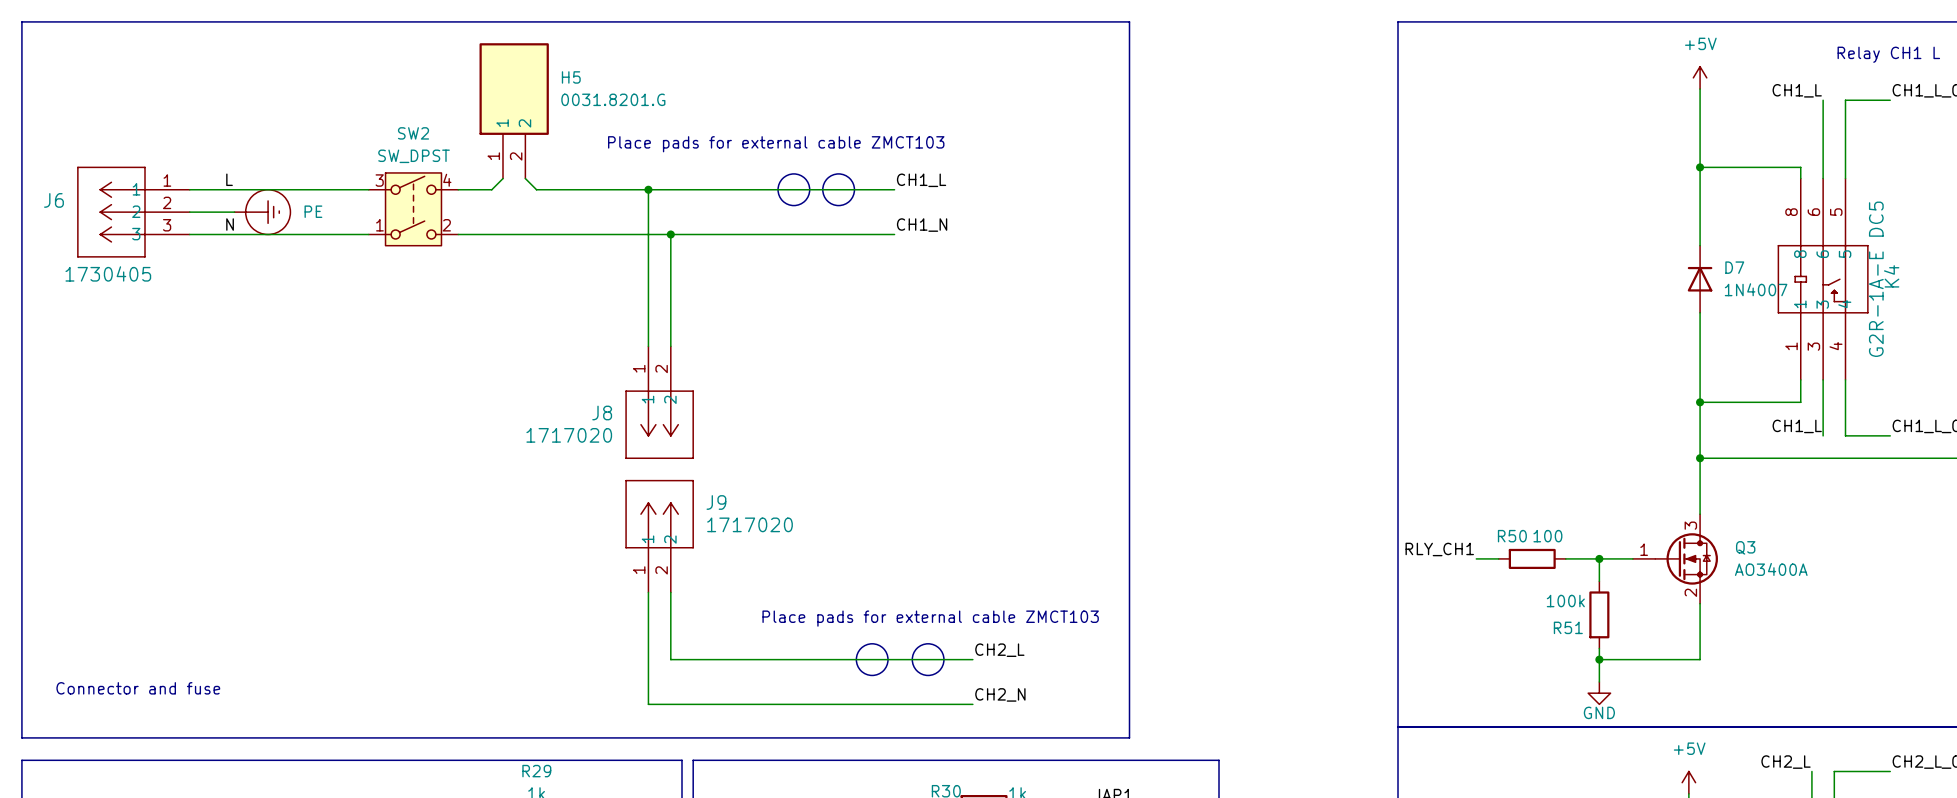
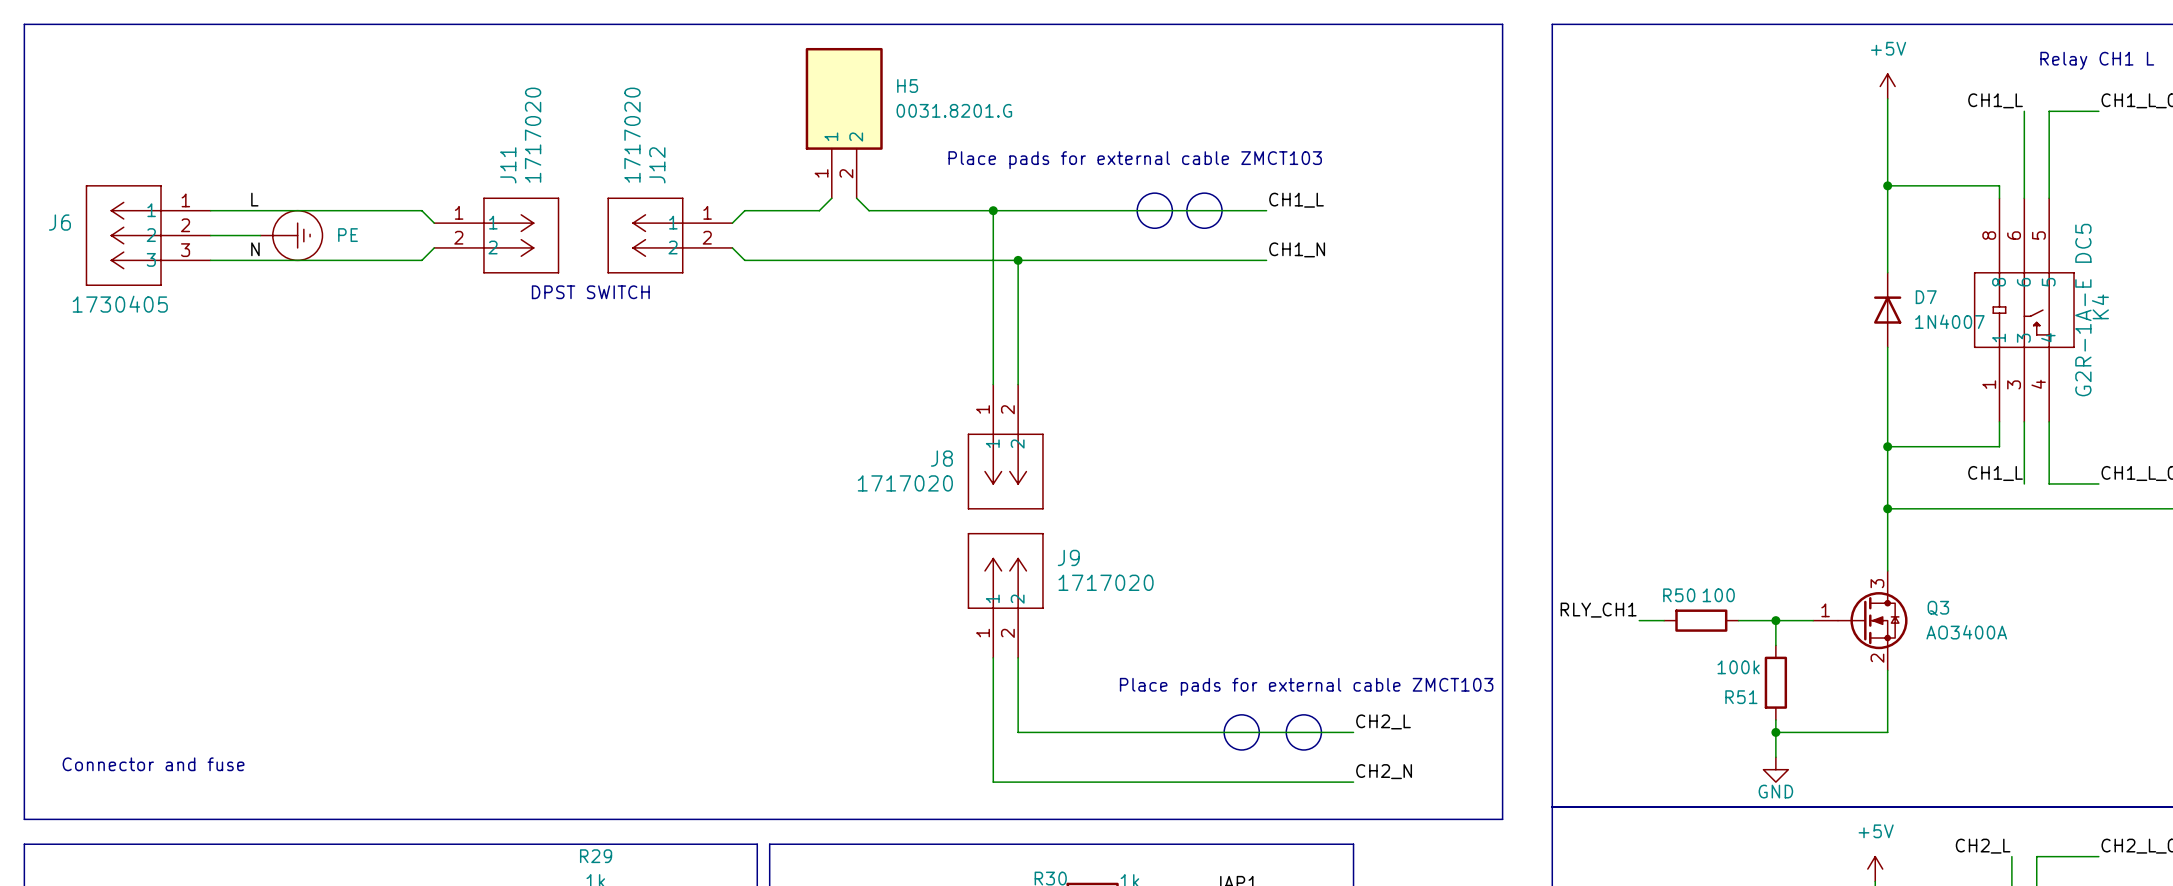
line: (1129, 21) (1129, 737) -> (1254, 24) (1502, 24) (1502, 819) (1254, 819)
H5 position: (514, 110) -> (844, 123)
text: Place pads for external cable ZMCT103 (776, 144) -> none
text: none -> Place pads for external cable ZMCT103 (1135, 160)
drawing: [778, 173, 810, 206] -> none
drawing: [822, 173, 855, 206] -> none
drawing: none -> [1137, 193, 1173, 229]
drawing: none -> [1186, 193, 1223, 229]
wire: (503, 178) (491, 189) (458, 189) -> none
wire: (525, 178) (536, 189) (670, 189) -> (732, 223) (744, 210)
wire: none -> (856, 198) (869, 210)
label: CH1_L (921, 180) -> none
label: none -> CH1_L (1296, 200)
wire: (648, 189) (648, 346) -> none
junction: (648, 189) -> none
wire: (737, 189) (782, 189) -> (819, 210) (831, 198)
junction: none -> (993, 210)
wire: none -> (1266, 210) (993, 210) (993, 384)
SW2: SW_DPST (413, 209) -> none
J11: none -> 1717020 (496, 235)
J12: none -> 1717020 (670, 235)
wire: none -> (732, 247) (744, 260)
label: CH1_N (922, 225) -> none
label: none -> CH1_N (1297, 249)
wire: (458, 234) (670, 234) (670, 346) -> none
junction: (670, 234) -> none
wire: none -> (993, 260) (1266, 260)
wire: none -> (1018, 260) (1018, 384)
junction: none -> (1018, 260)
text: none -> DPST SWITCH (590, 292)
J8 position: (659, 402) -> (1005, 447)
J9 position: (659, 536) -> (1005, 595)
wire: (648, 592) (648, 704) (894, 704) -> (993, 657) (993, 782)
wire: (670, 592) (670, 659) (916, 659) -> (1018, 657) (1018, 732)
text: Place pads for external cable ZMCT103 (930, 618) -> none
text: none -> Place pads for external cable ZMCT103 (1306, 686)
drawing: [856, 643, 889, 676] -> none
drawing: [912, 643, 944, 676] -> none
drawing: none -> [1224, 714, 1260, 750]
drawing: none -> [1286, 714, 1322, 750]
label: CH2_L (999, 650) -> none
label: none -> CH2_L (1383, 721)
wire: none -> (1080, 732) (1353, 732)
label: CH2_N (1000, 694) -> none
label: none -> CH2_N (1384, 771)
wire: none -> (1080, 782) (1353, 782)

